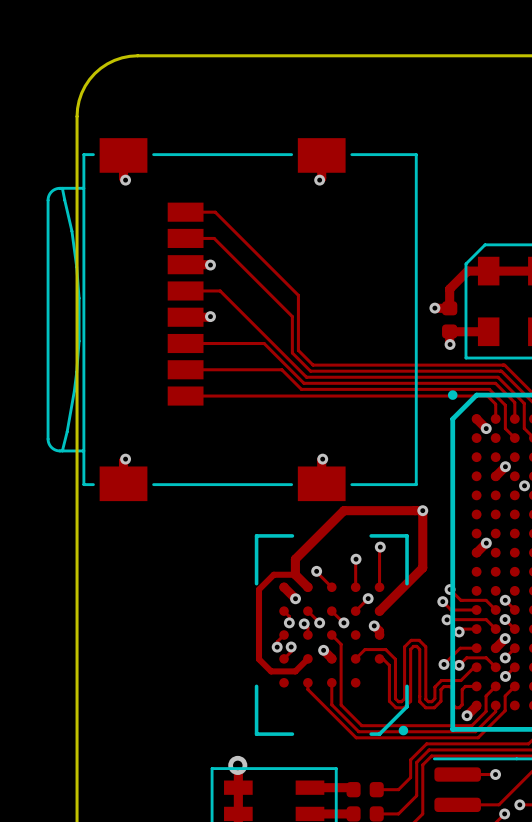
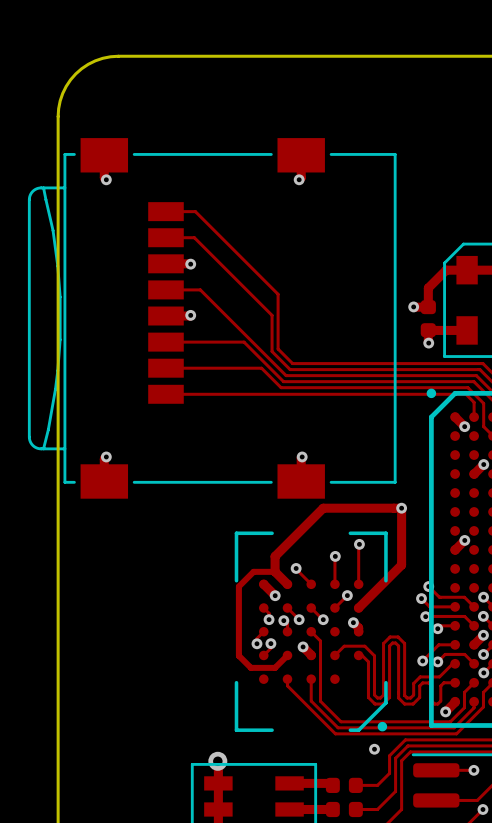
via: none -> (374, 749)

